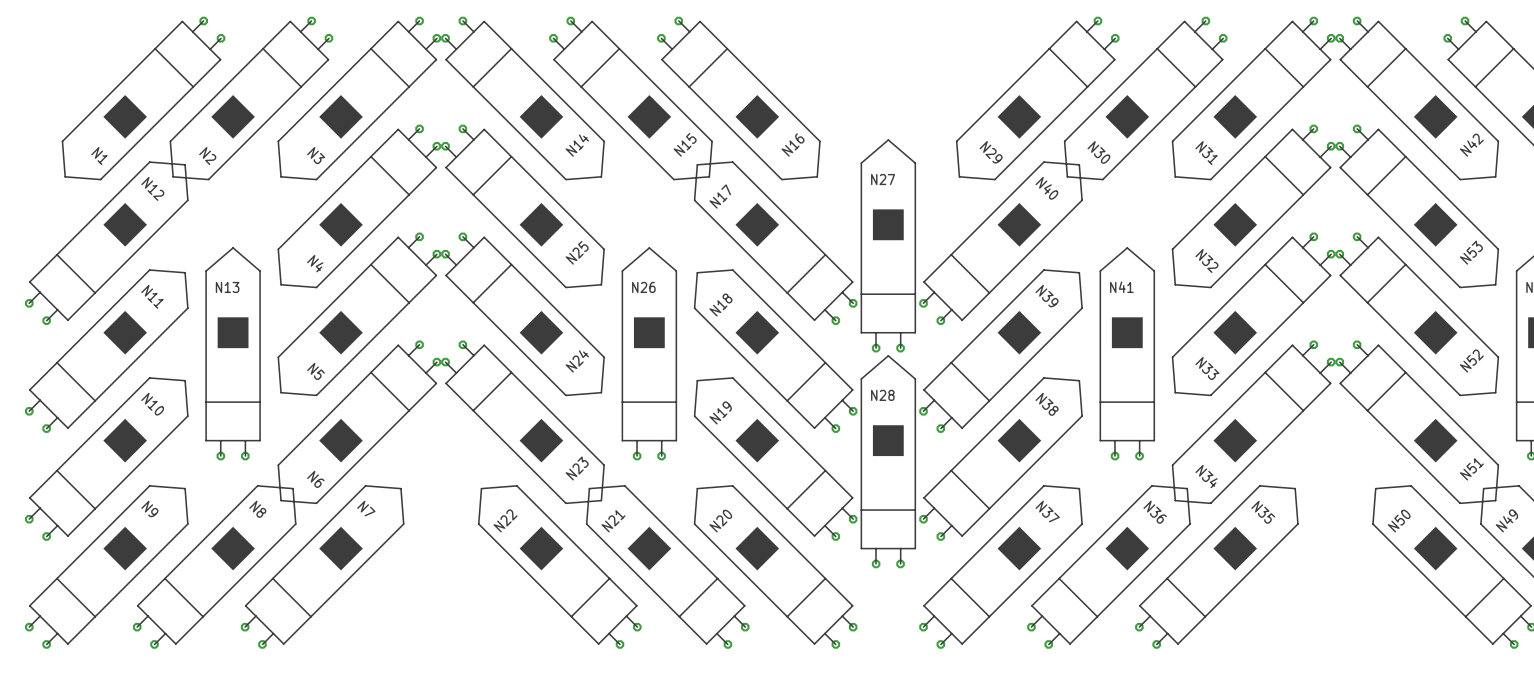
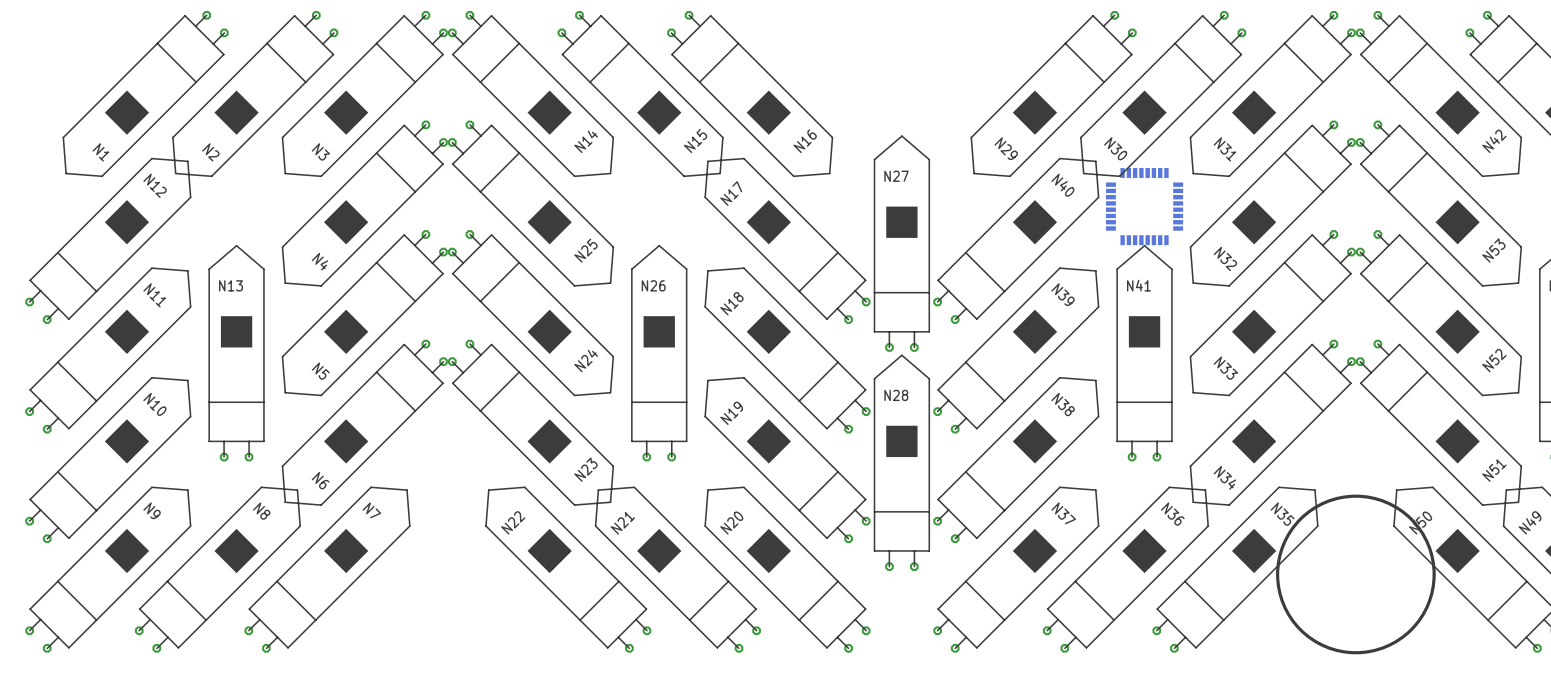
part: none -> (1144, 206)
drawing: none -> [1276, 494, 1436, 655]

